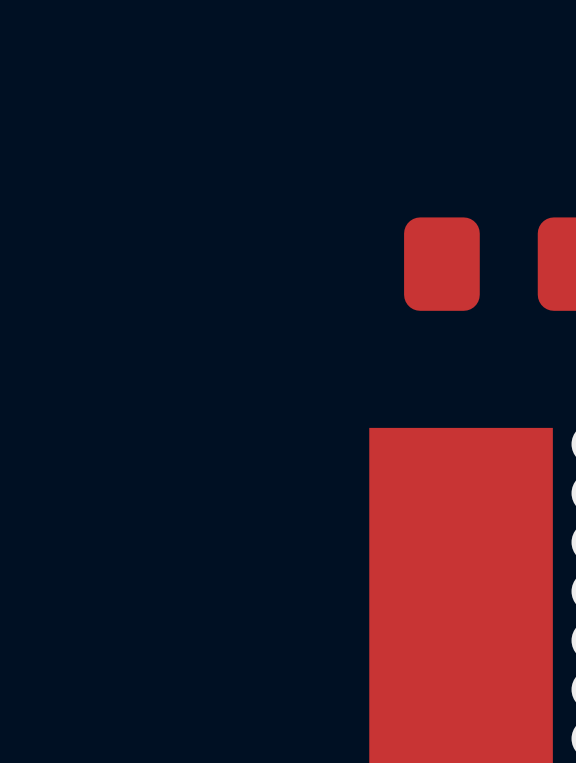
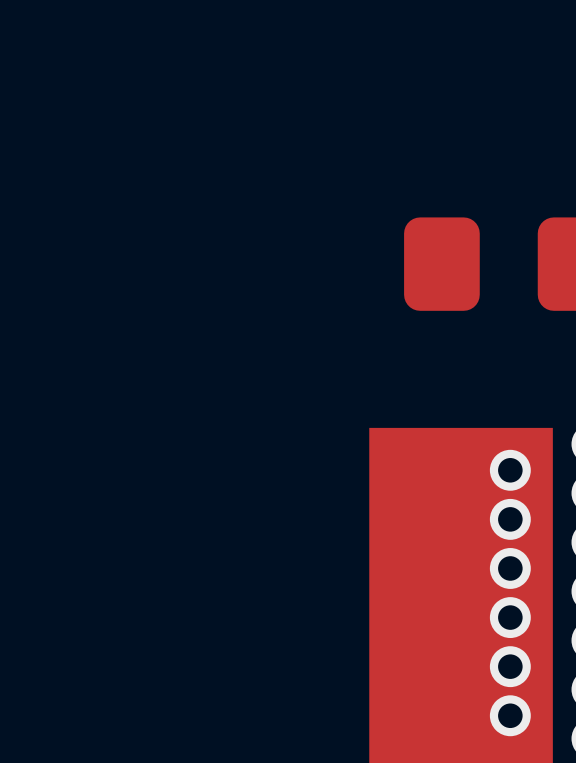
via: none -> (510, 470)
via: none -> (510, 519)
via: none -> (510, 568)
via: none -> (510, 617)
via: none -> (510, 666)
via: none -> (510, 715)

